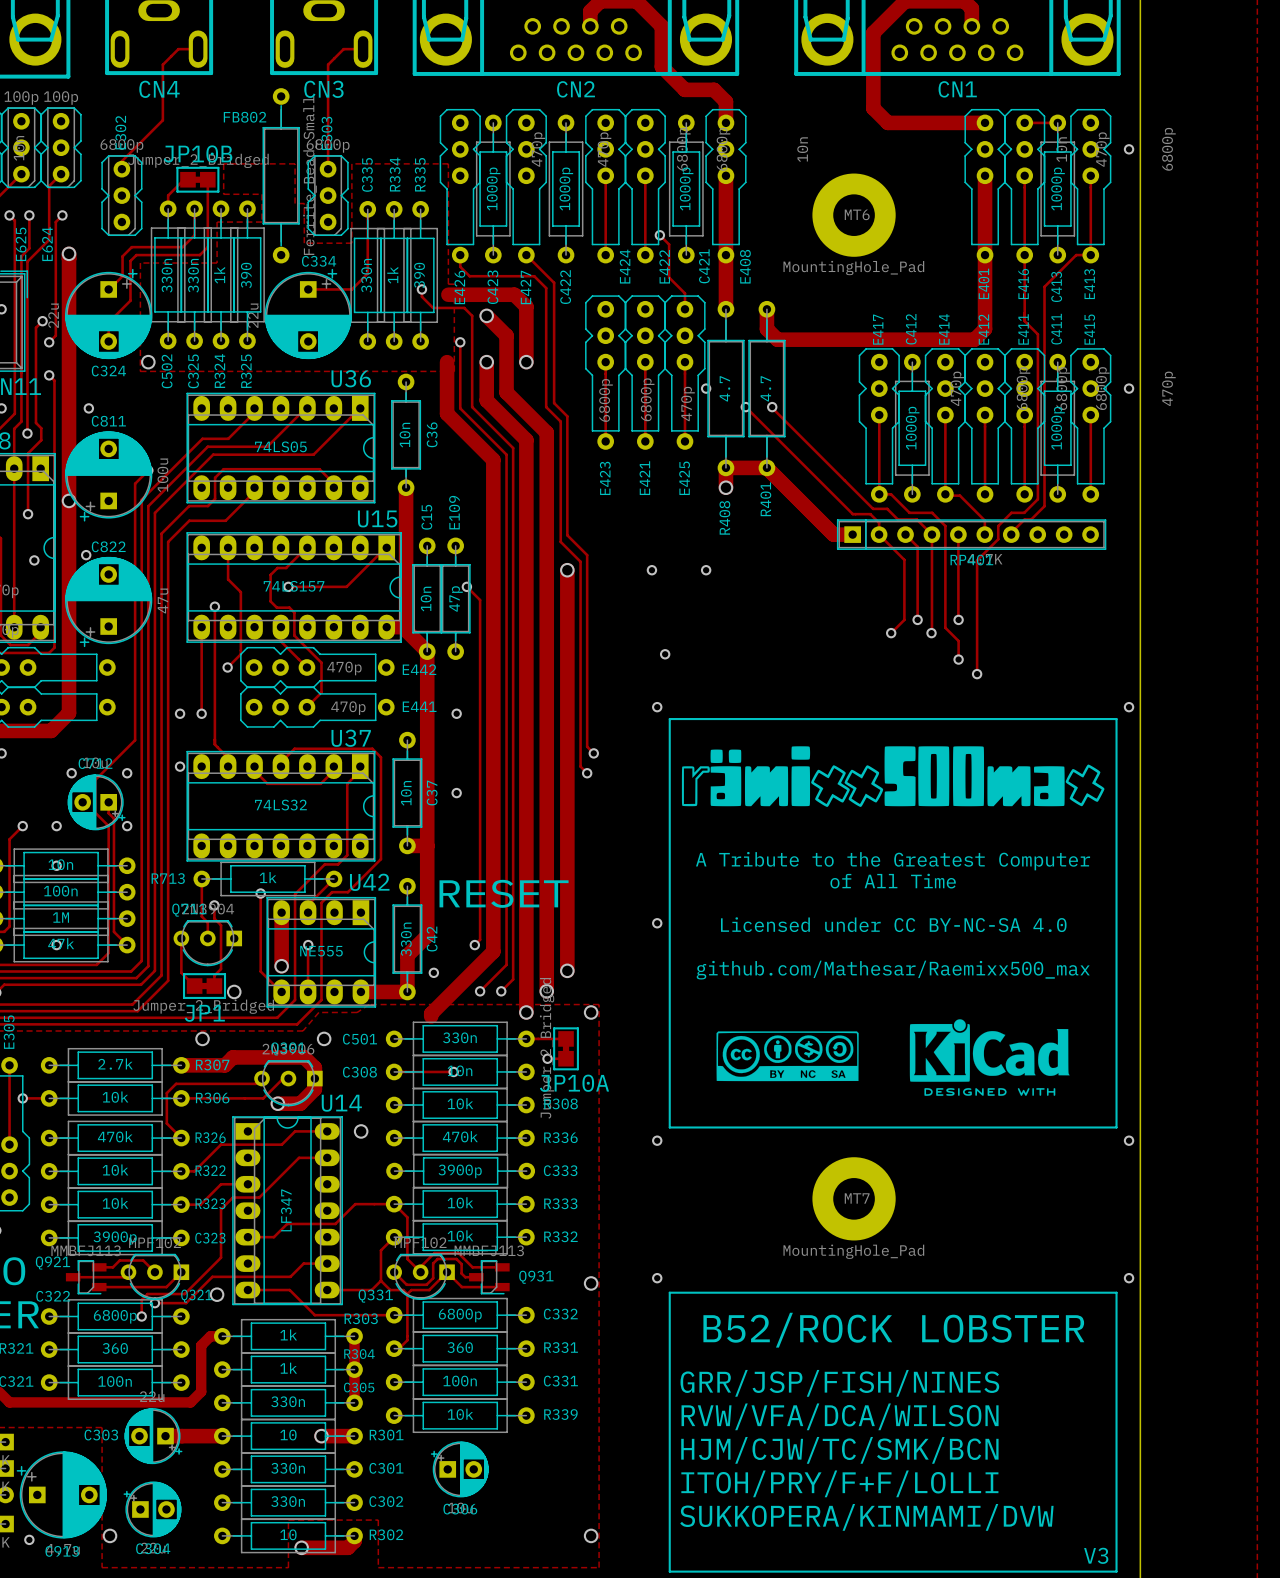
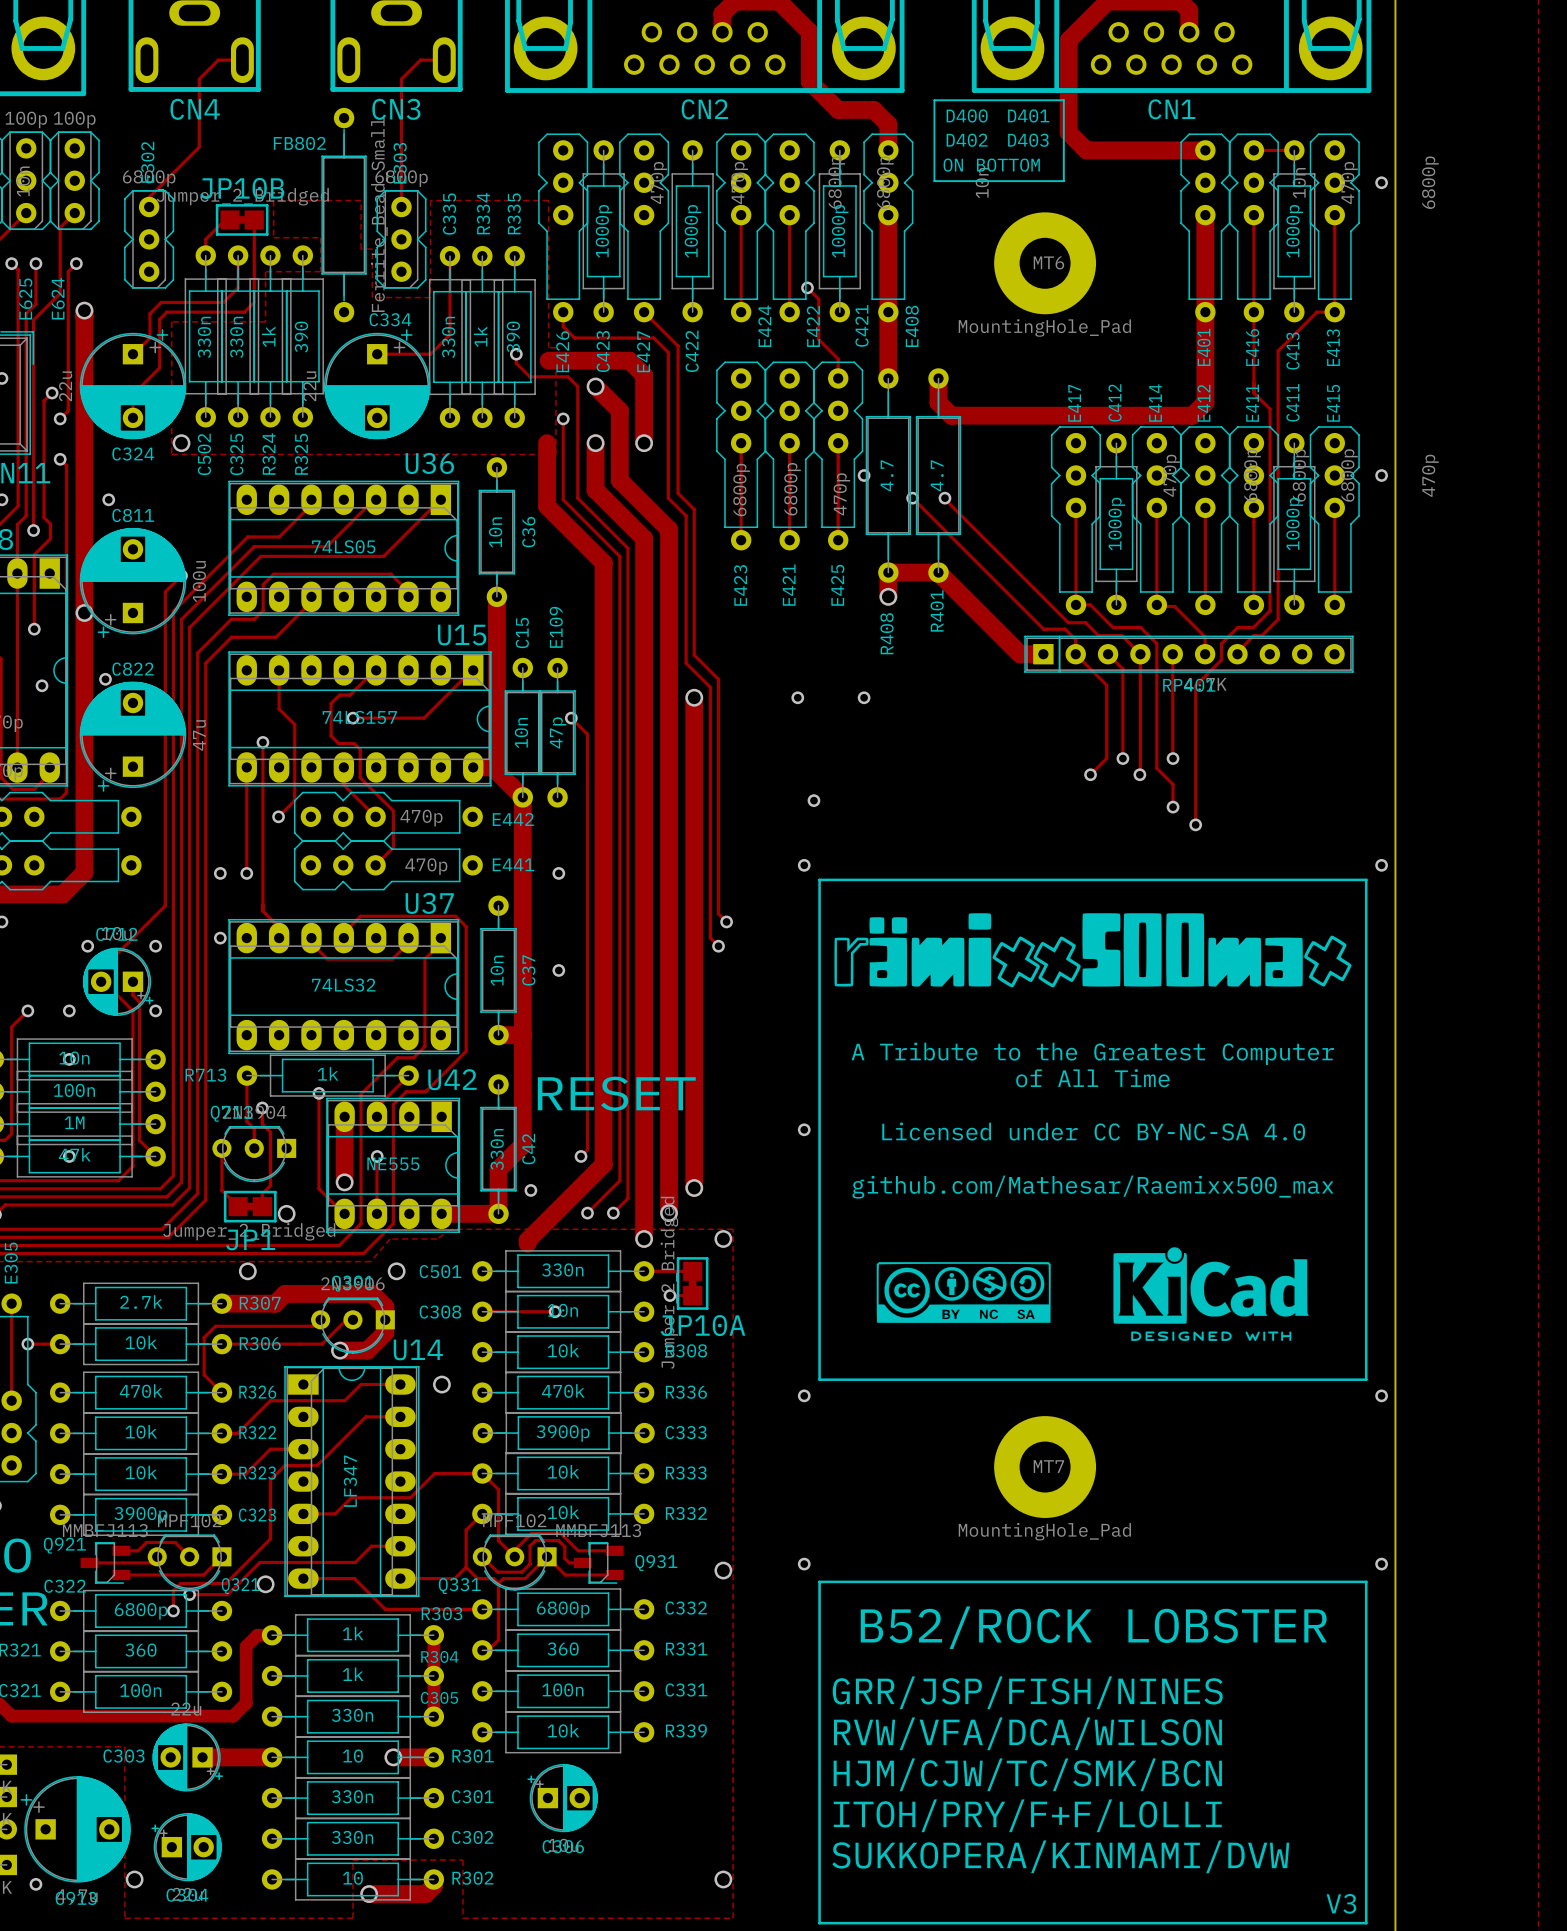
line: none -> (934, 100) (1063, 100) (1063, 181) (934, 181) (934, 100)
D400: none -> (967, 115)
D401: none -> (1028, 115)
D402: none -> (967, 140)
D403: none -> (1028, 140)
text: none -> ON BOTTOM (991, 165)

